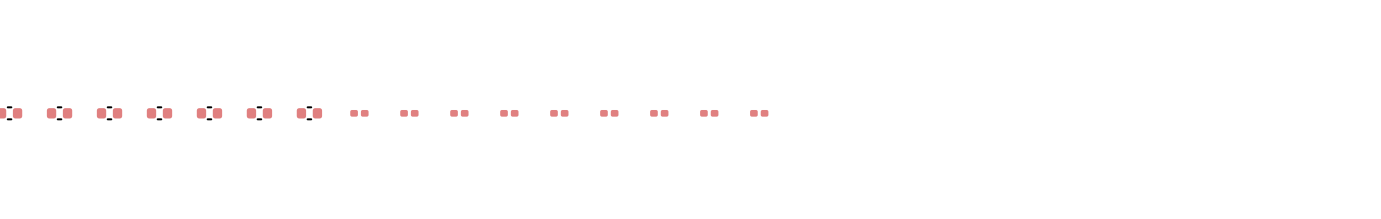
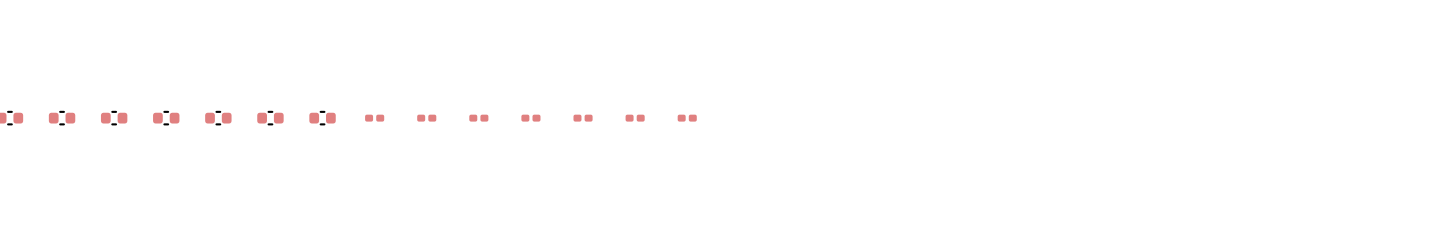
part: (709, 113) -> none
part: (759, 113) -> none

